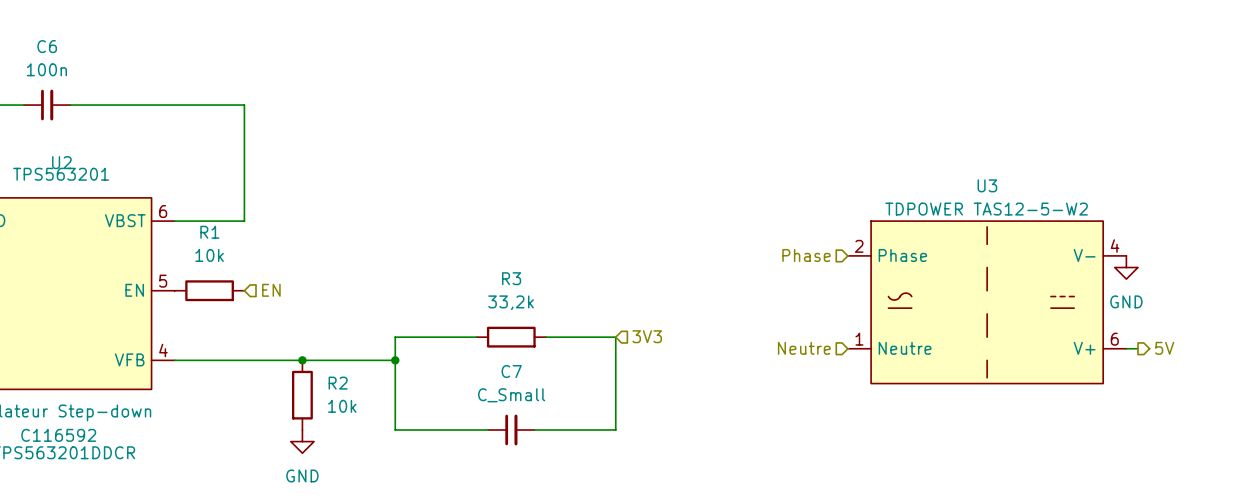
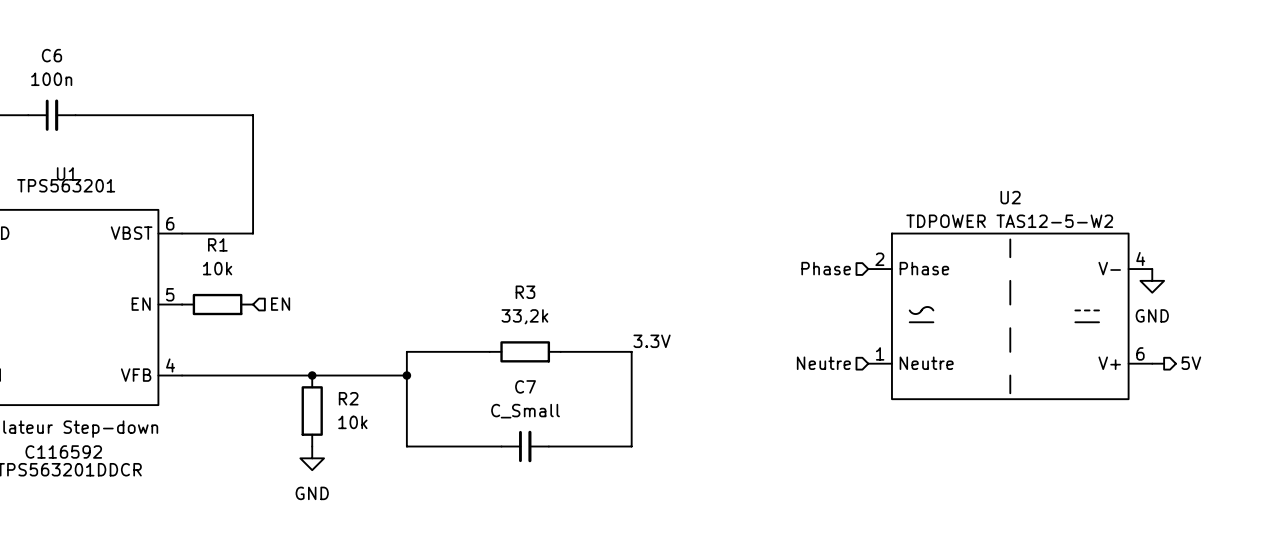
U2 name: U2 (61, 162) -> U1 (66, 173)
U3 name: U3 (987, 185) -> U2 (1010, 197)
label: none -> 3.3V (652, 341)
hierarchical label: 3V3 (647, 336) -> none

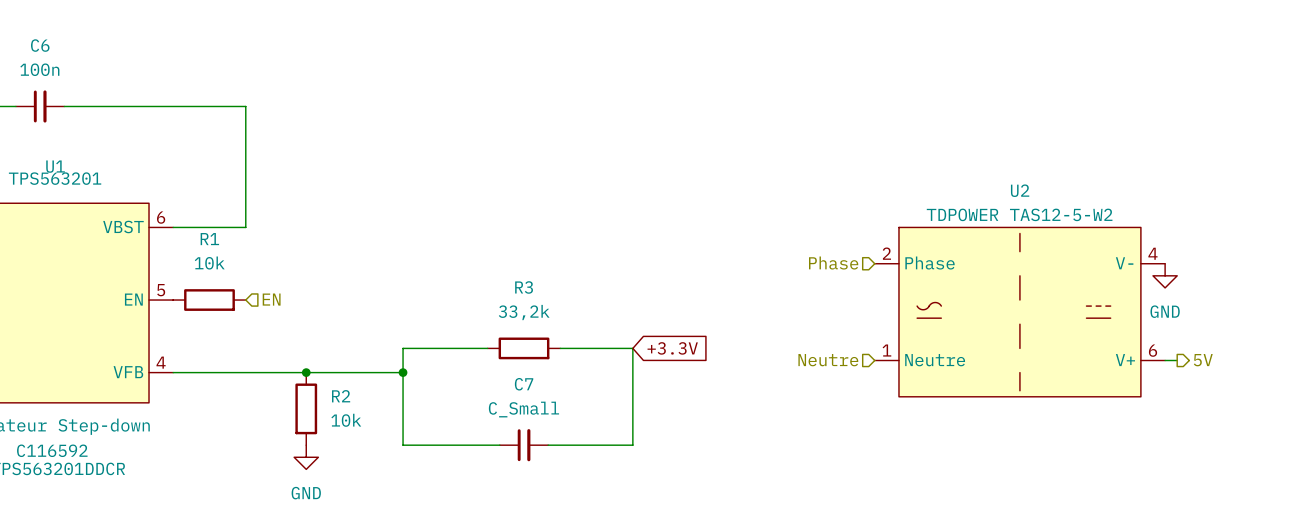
label: 3.3V (652, 341) -> none
global label: none -> +3.3V (672, 348)

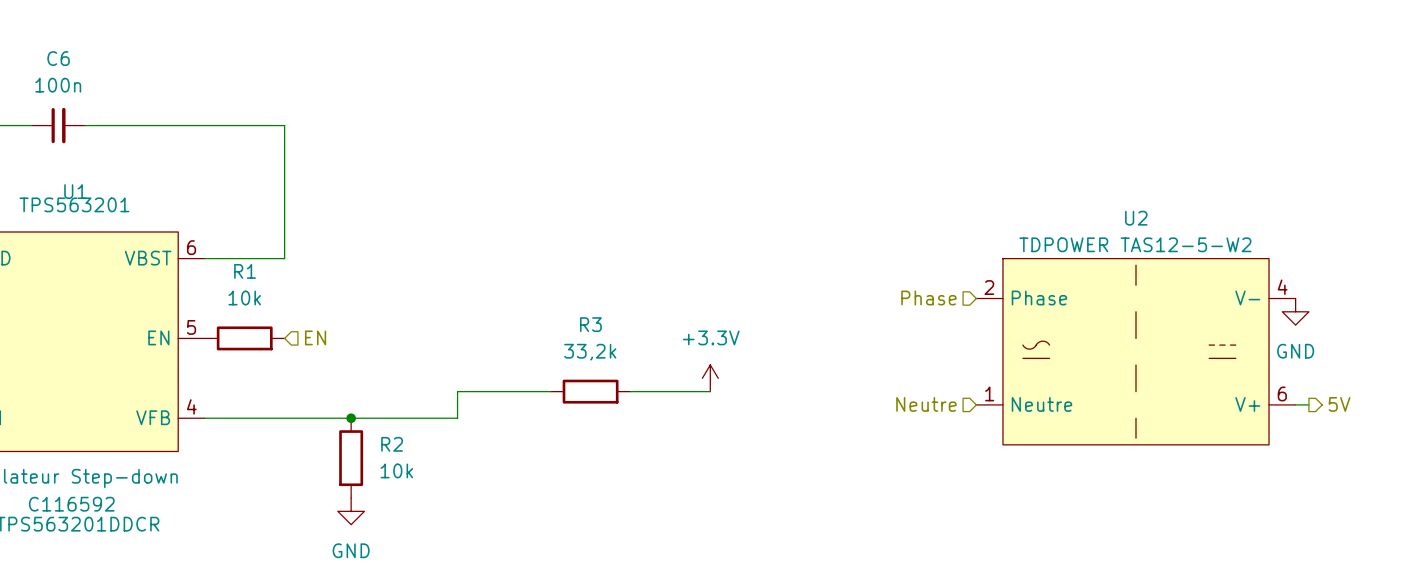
power symbol: none -> +3.3V (710, 378)
wire: (632, 348) (632, 445) (548, 445) -> none
global label: +3.3V (672, 348) -> none
wire: (403, 372) (403, 445) (499, 445) -> none
junction: (403, 372) -> none
C7: C_Small (523, 445) -> none

